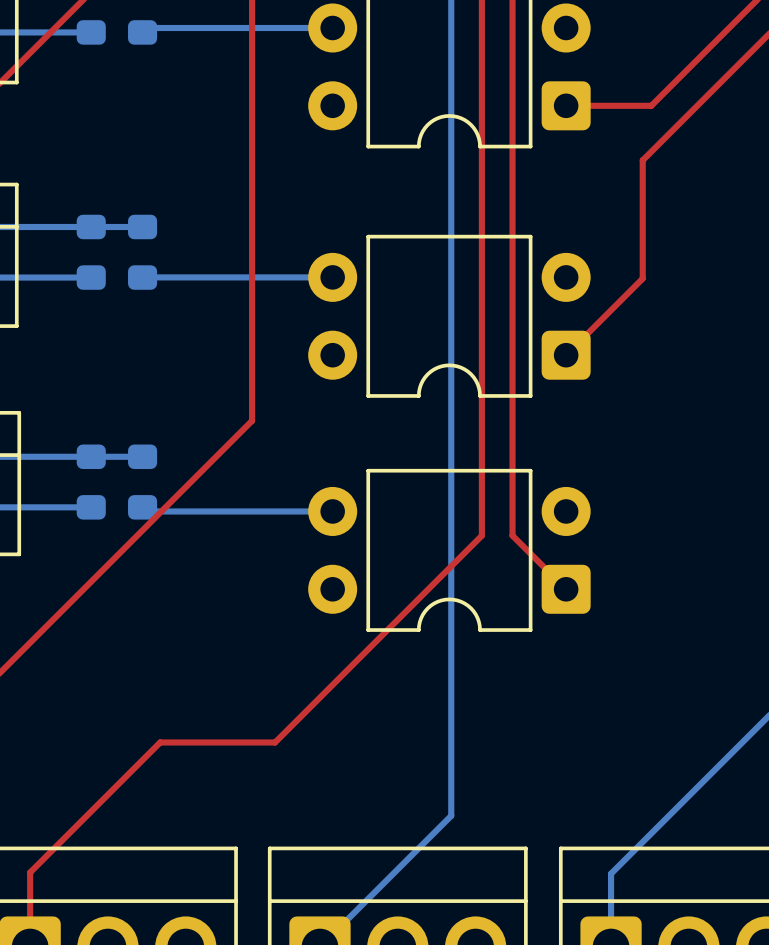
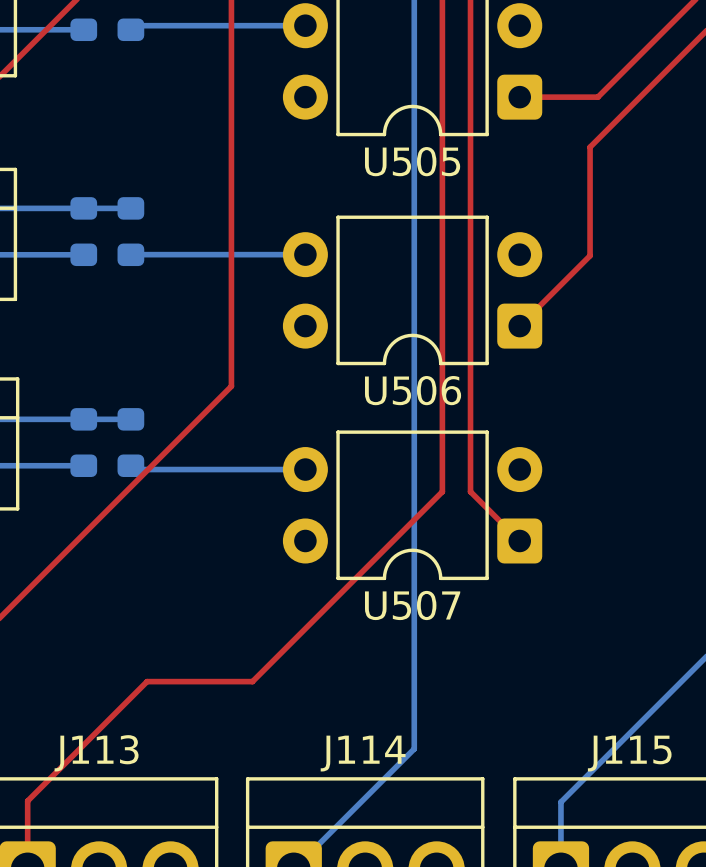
U505 name: none -> U505 (412, 161)
U506 name: none -> U506 (413, 390)
U507 name: none -> U507 (412, 605)
J114 name: none -> J114 (363, 753)
J113 name: none -> J113 (96, 753)
J115 name: none -> J115 (629, 753)

